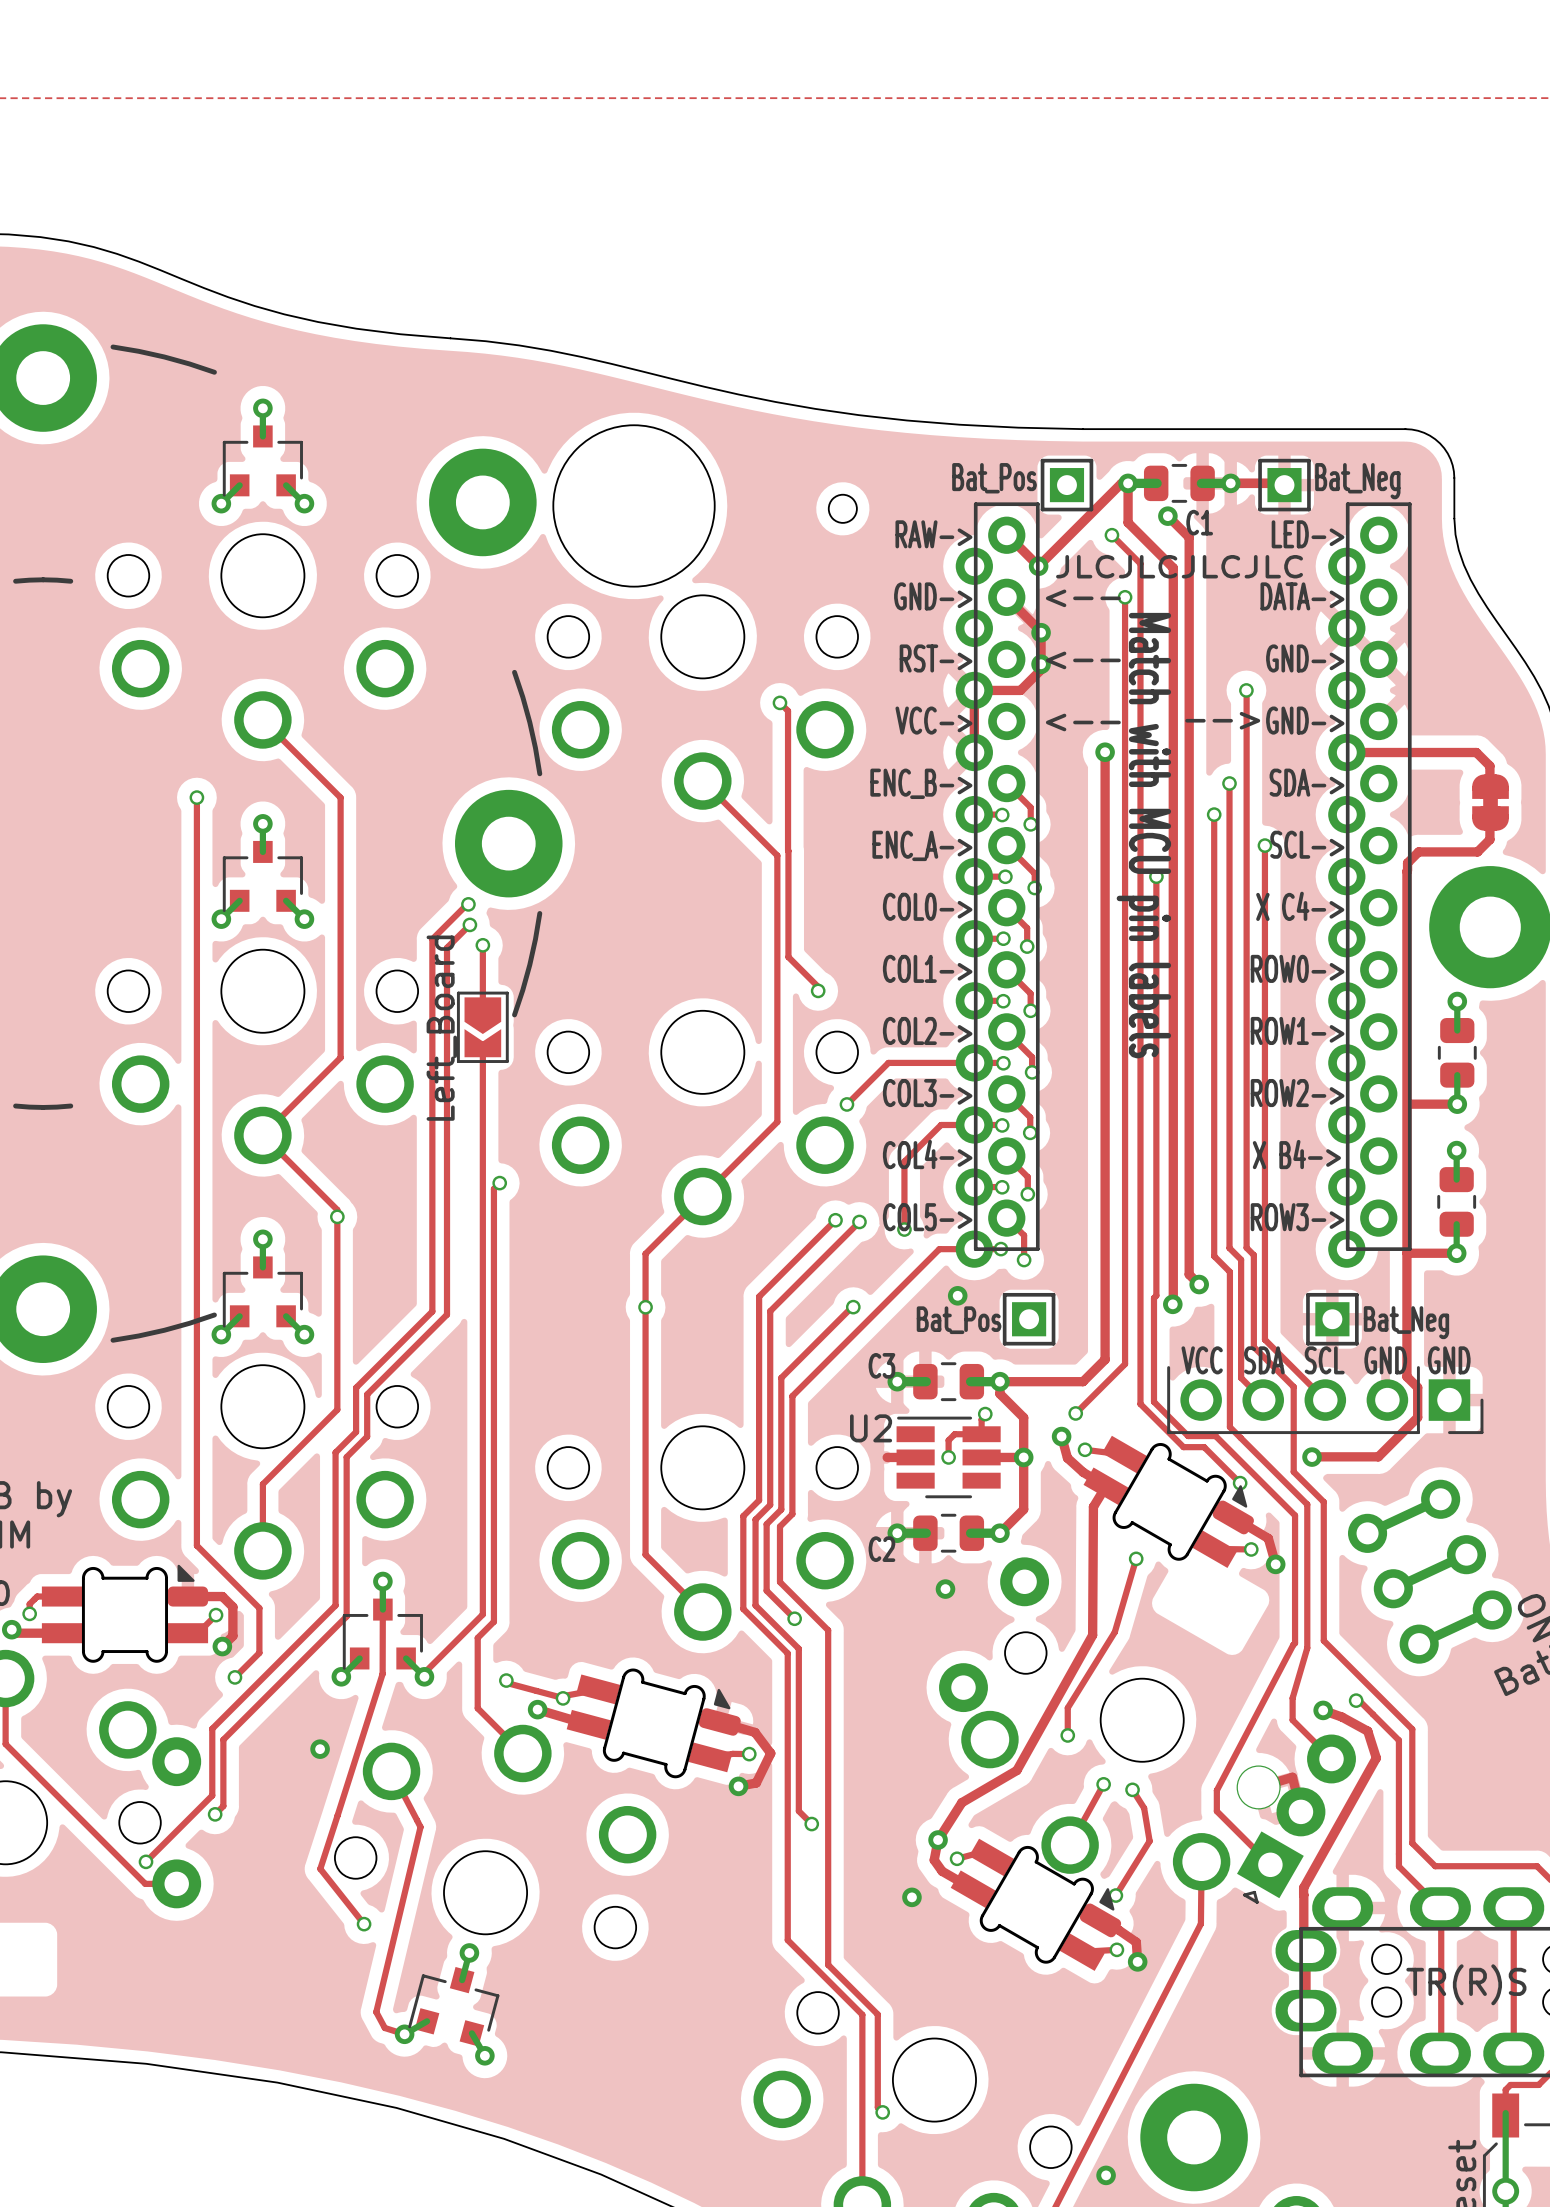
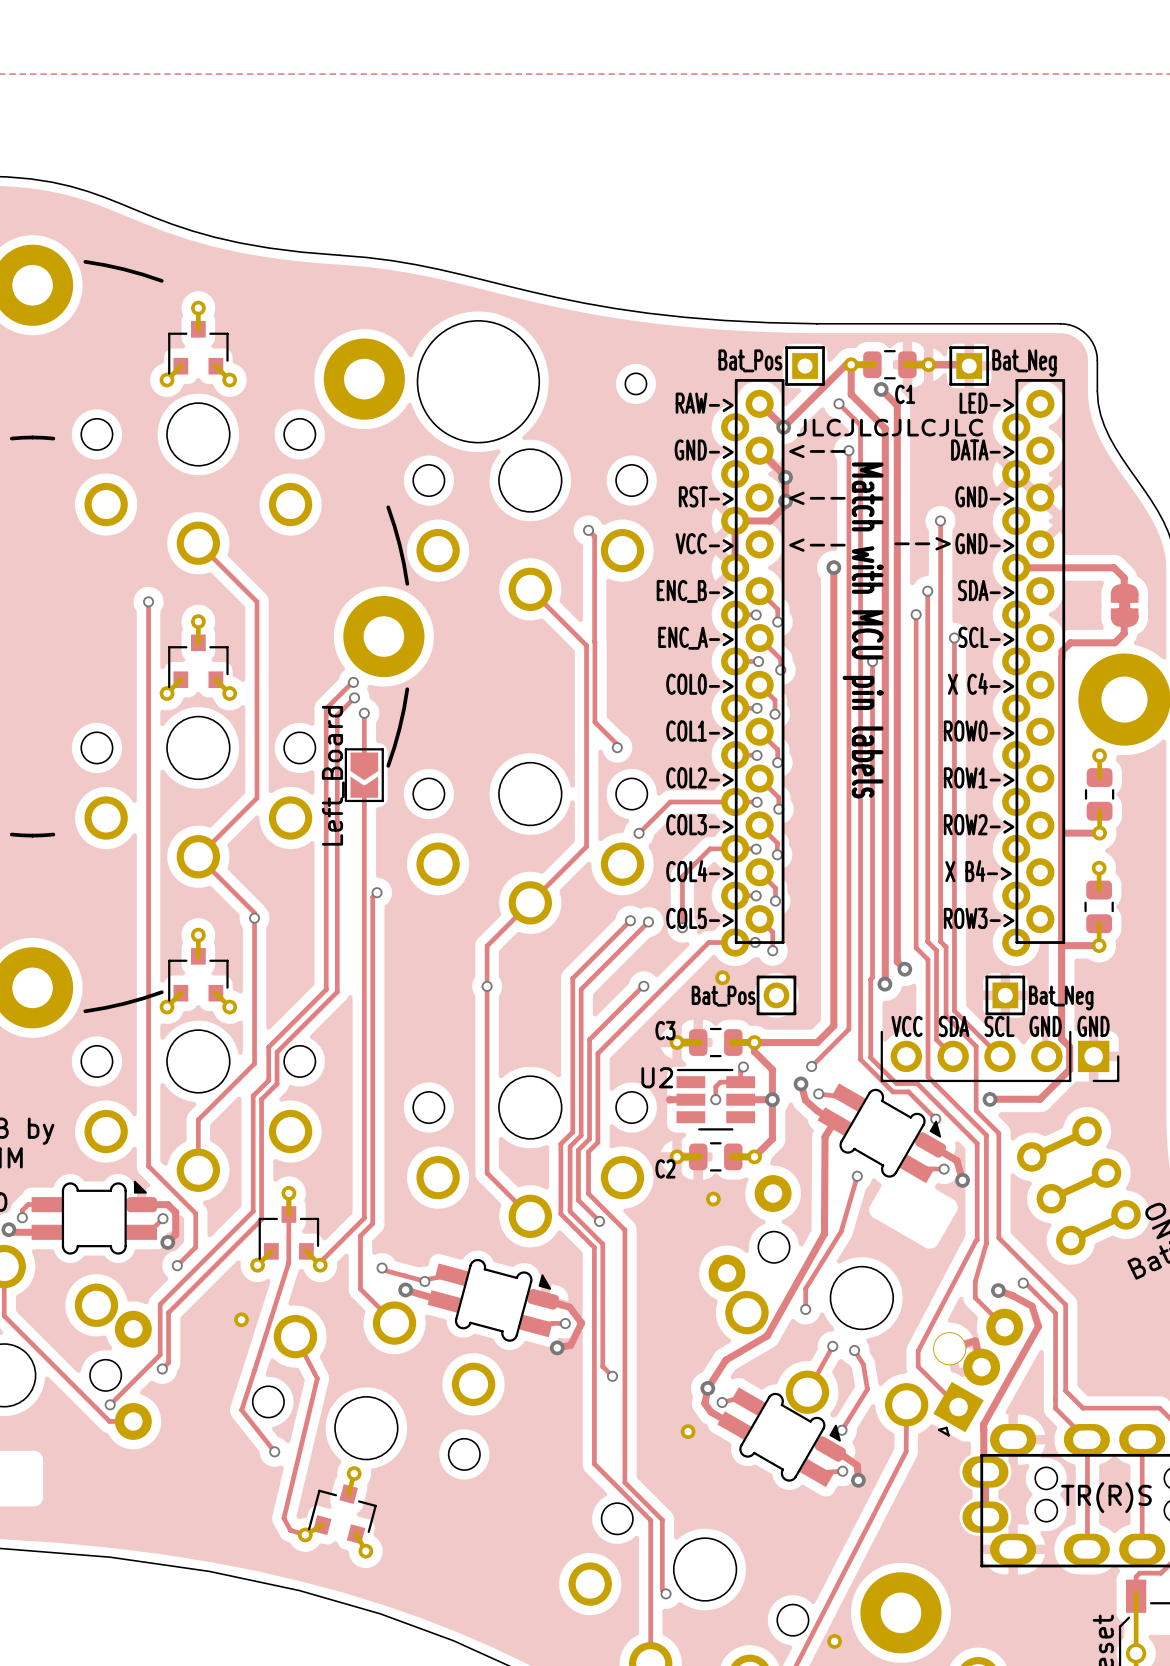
part footprint: [1002, 1292, 1056, 1346] -> [756, 975, 797, 1016]

